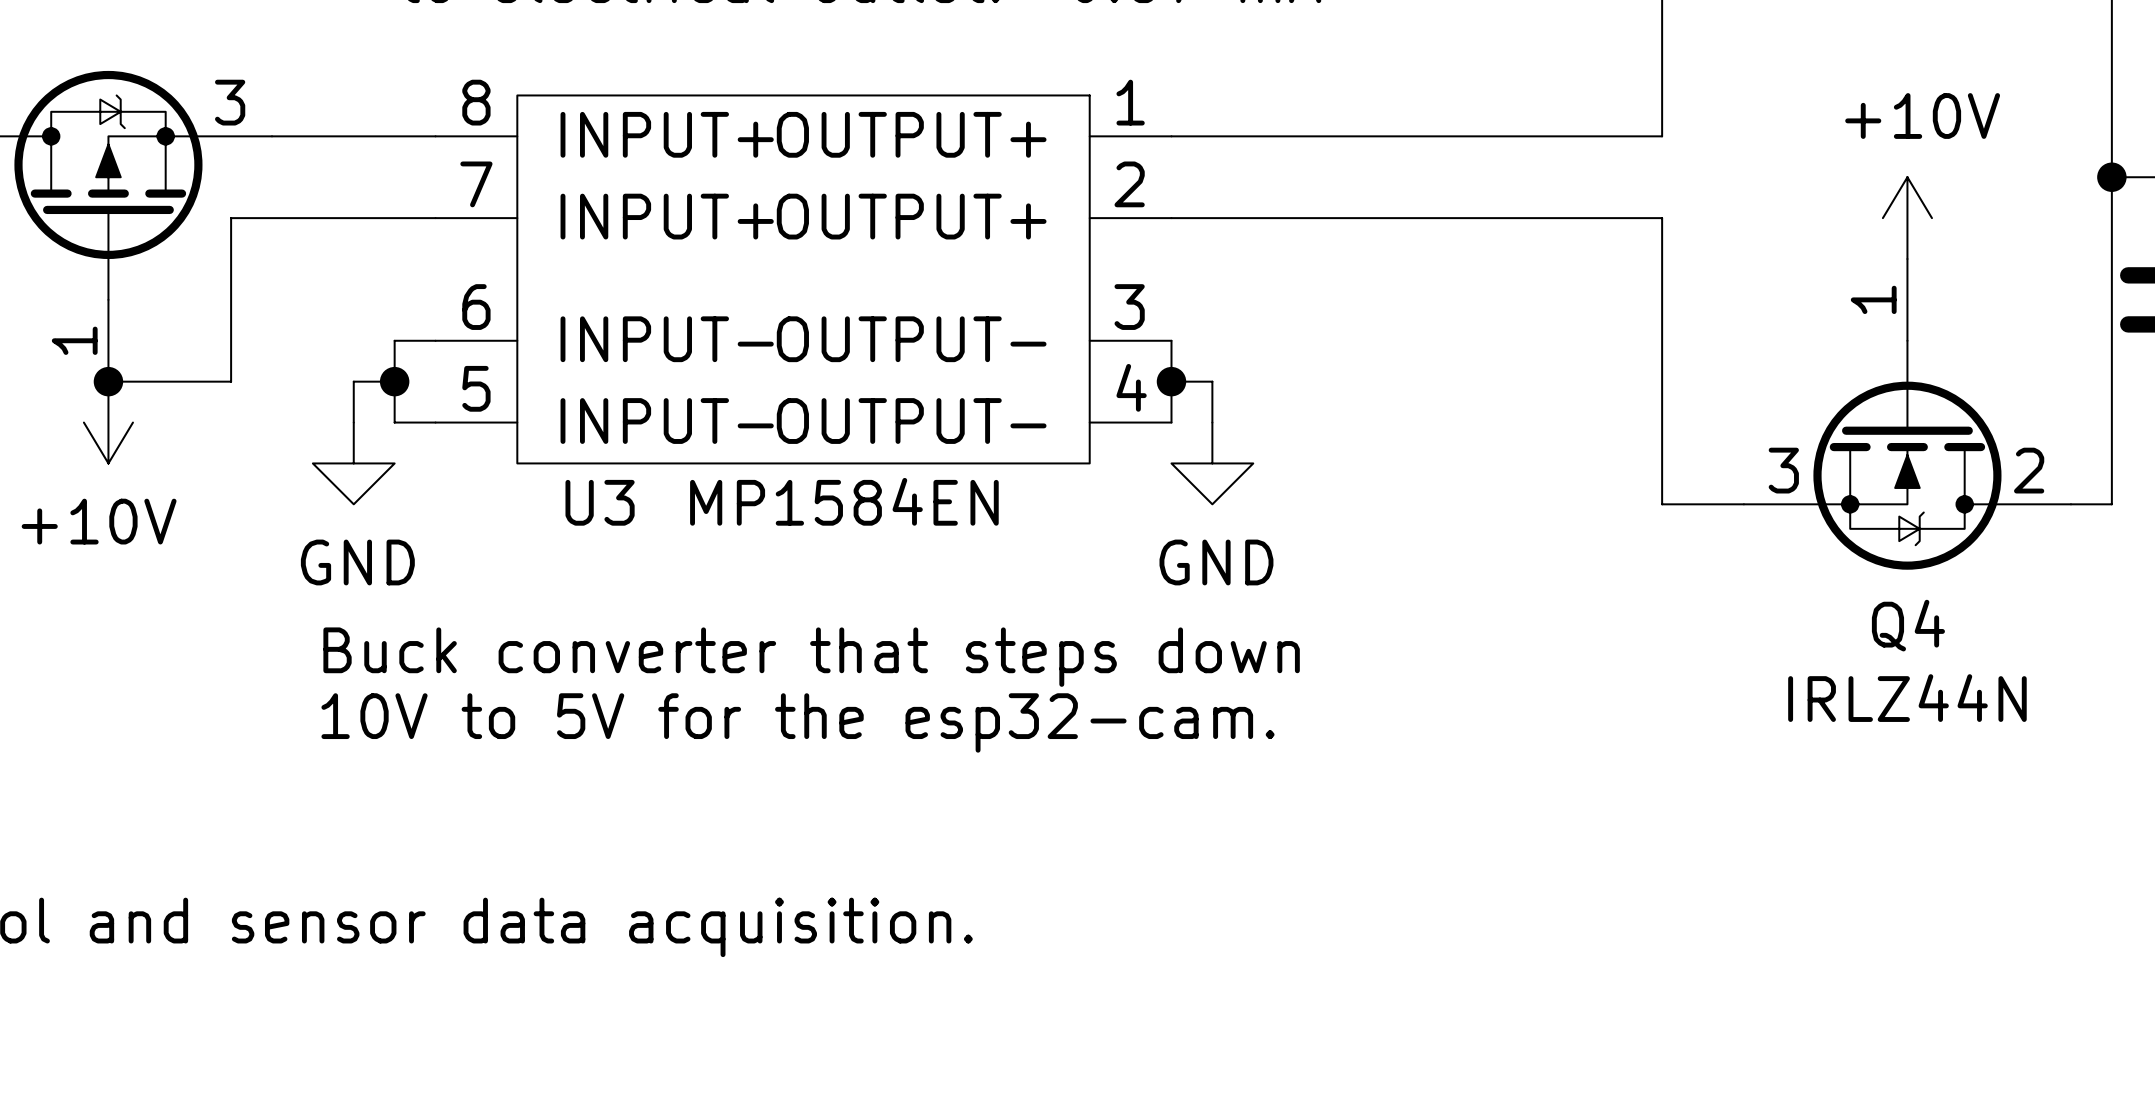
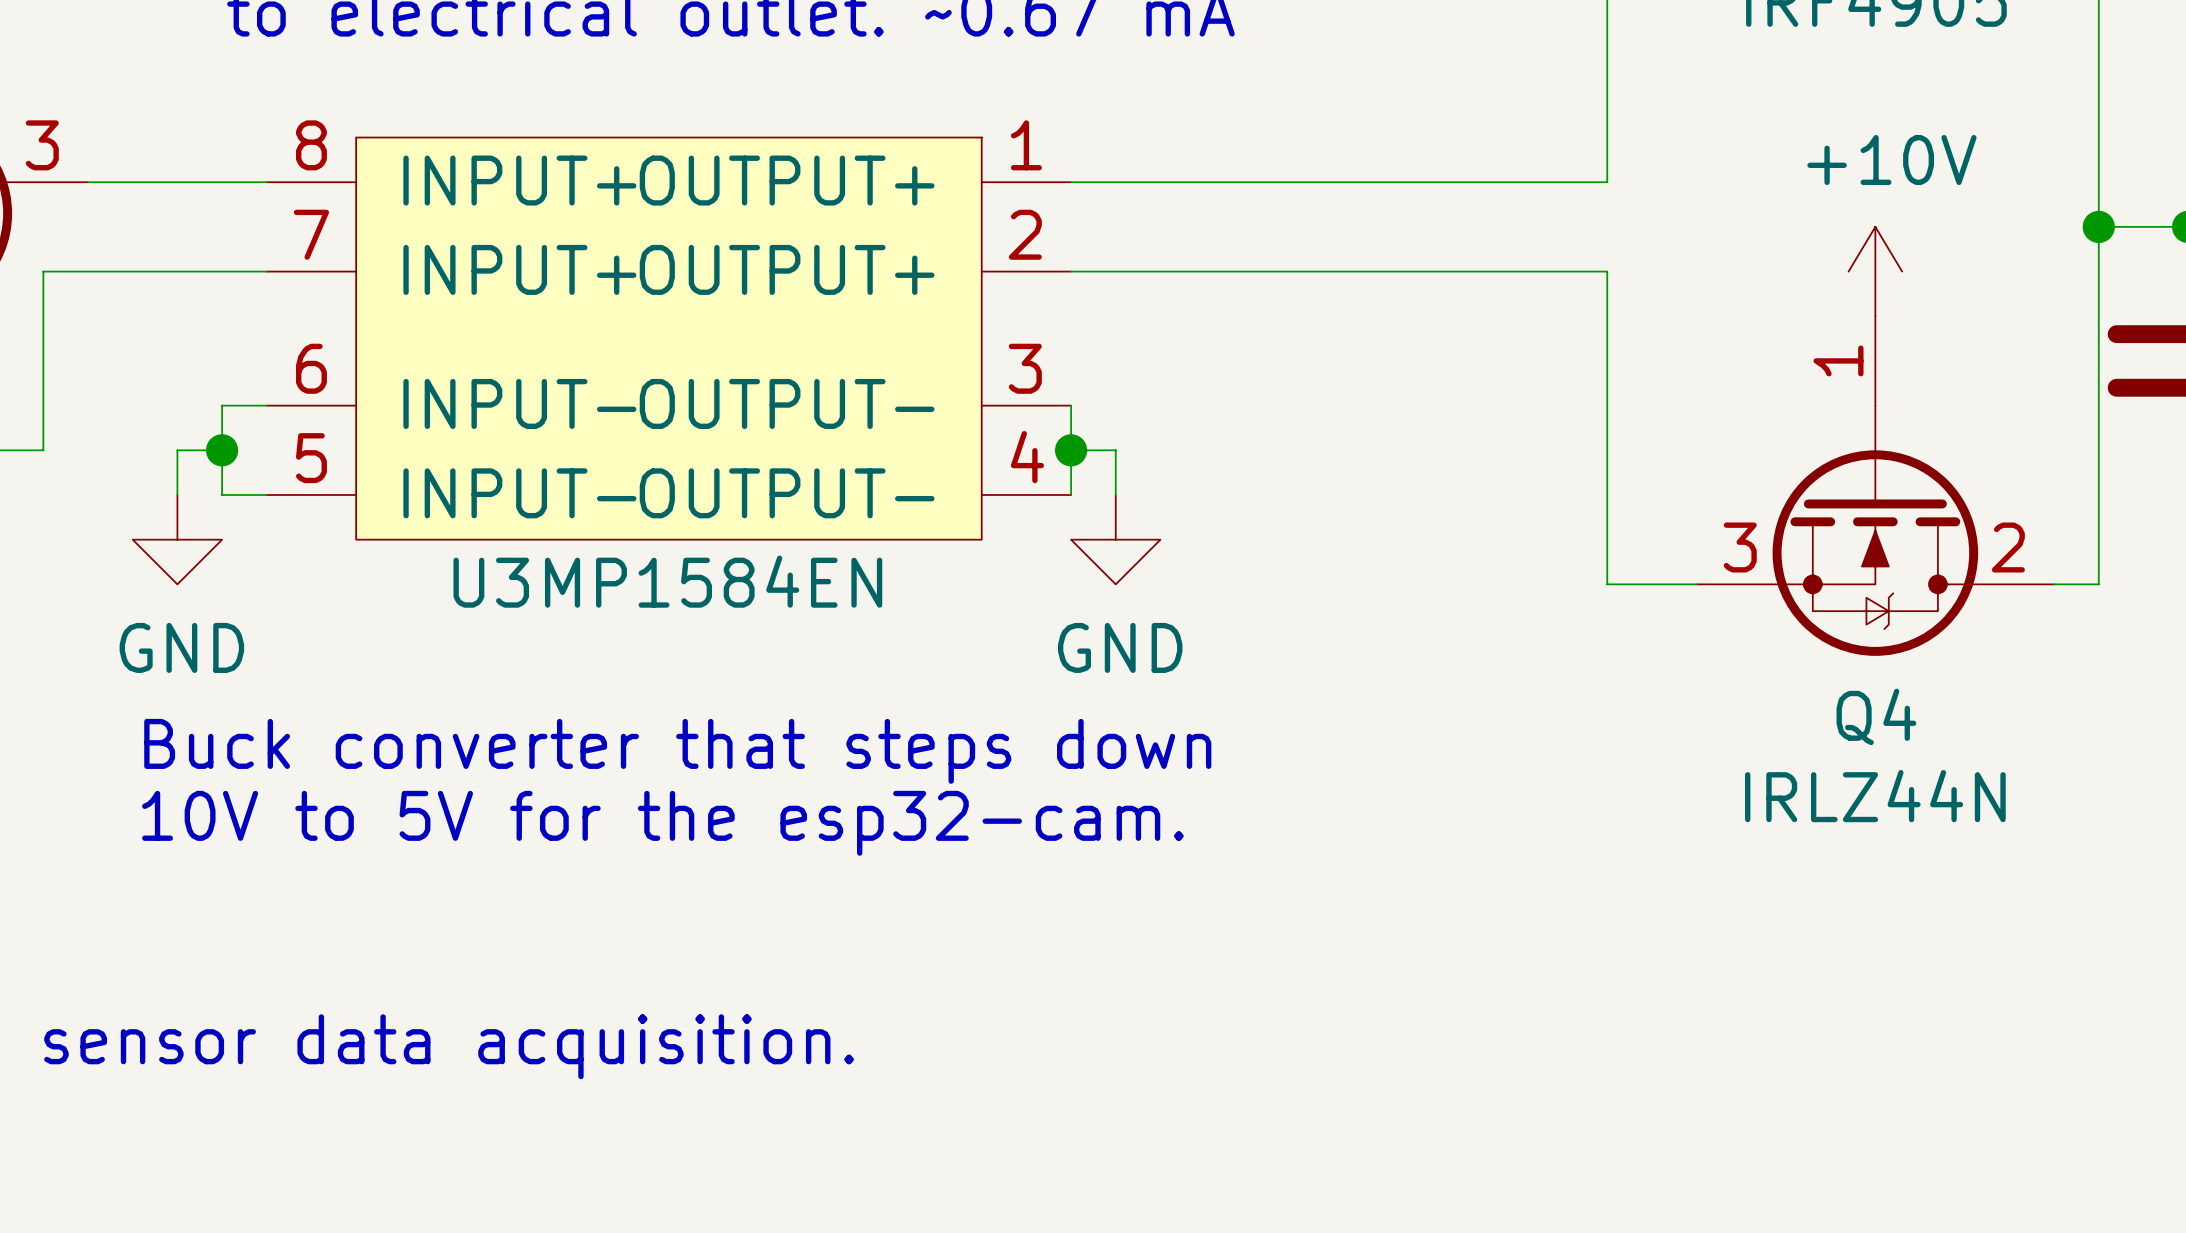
U3 name position: U3 (600, 502) -> U3 (491, 582)

